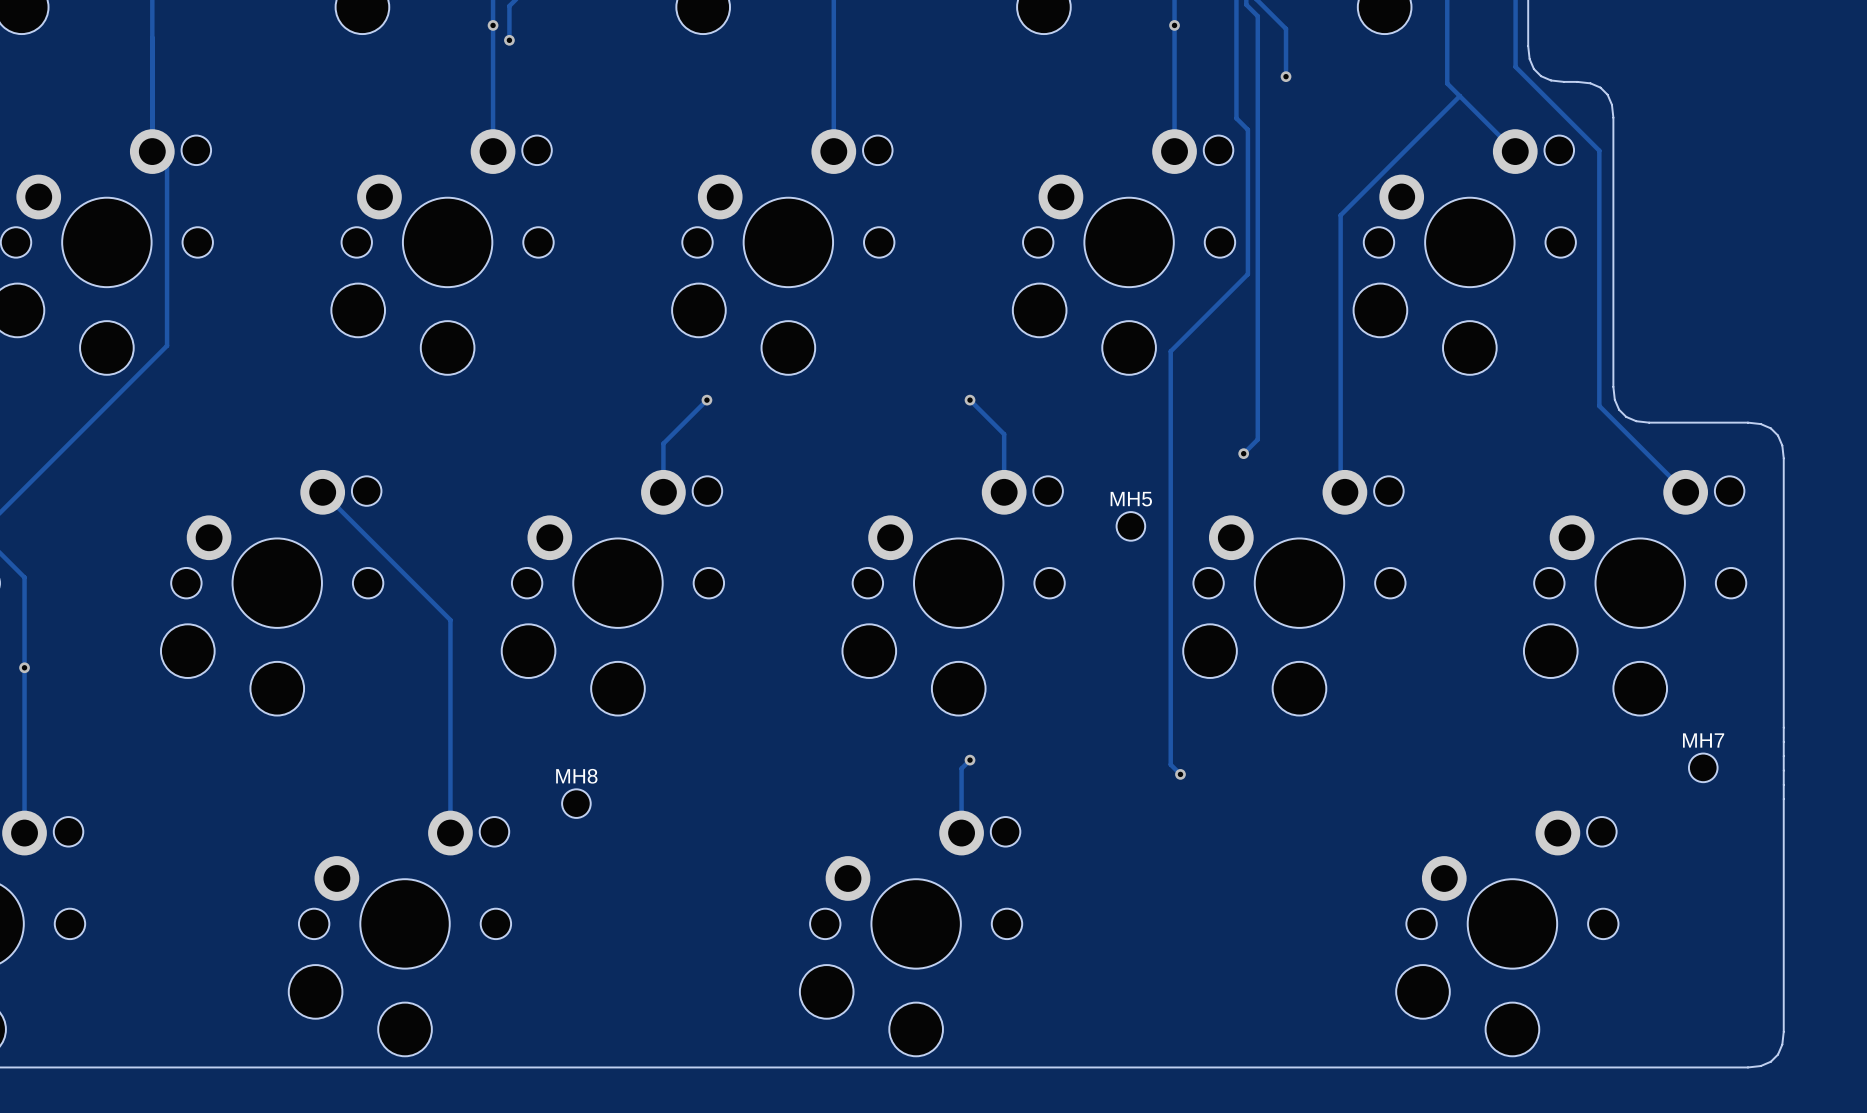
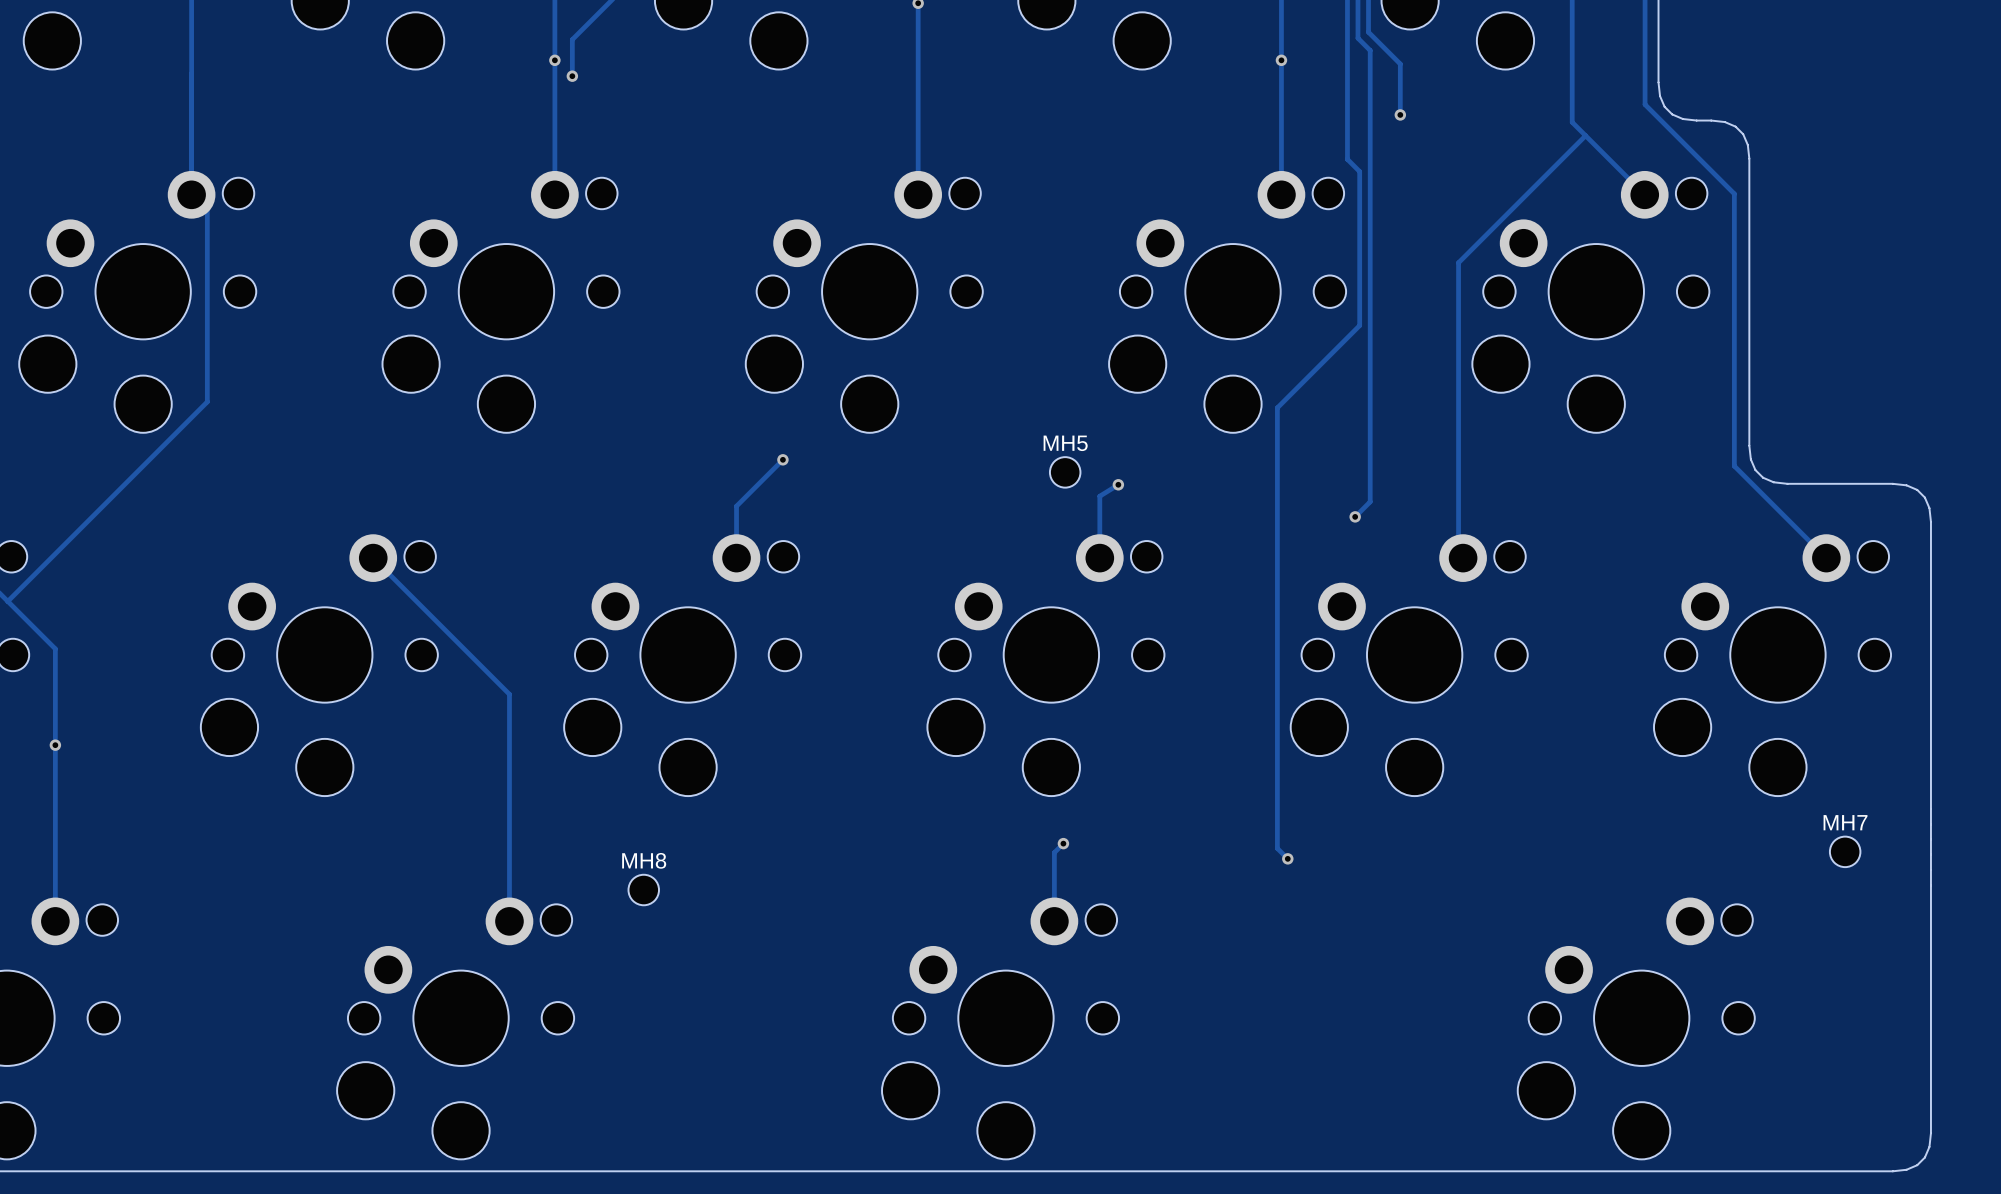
track: (970, 400) (1004, 434) -> (1118, 484) (1099, 496)
via position: (970, 400) -> (1118, 484)
MH5 position: (1130, 526) -> (1065, 472)

